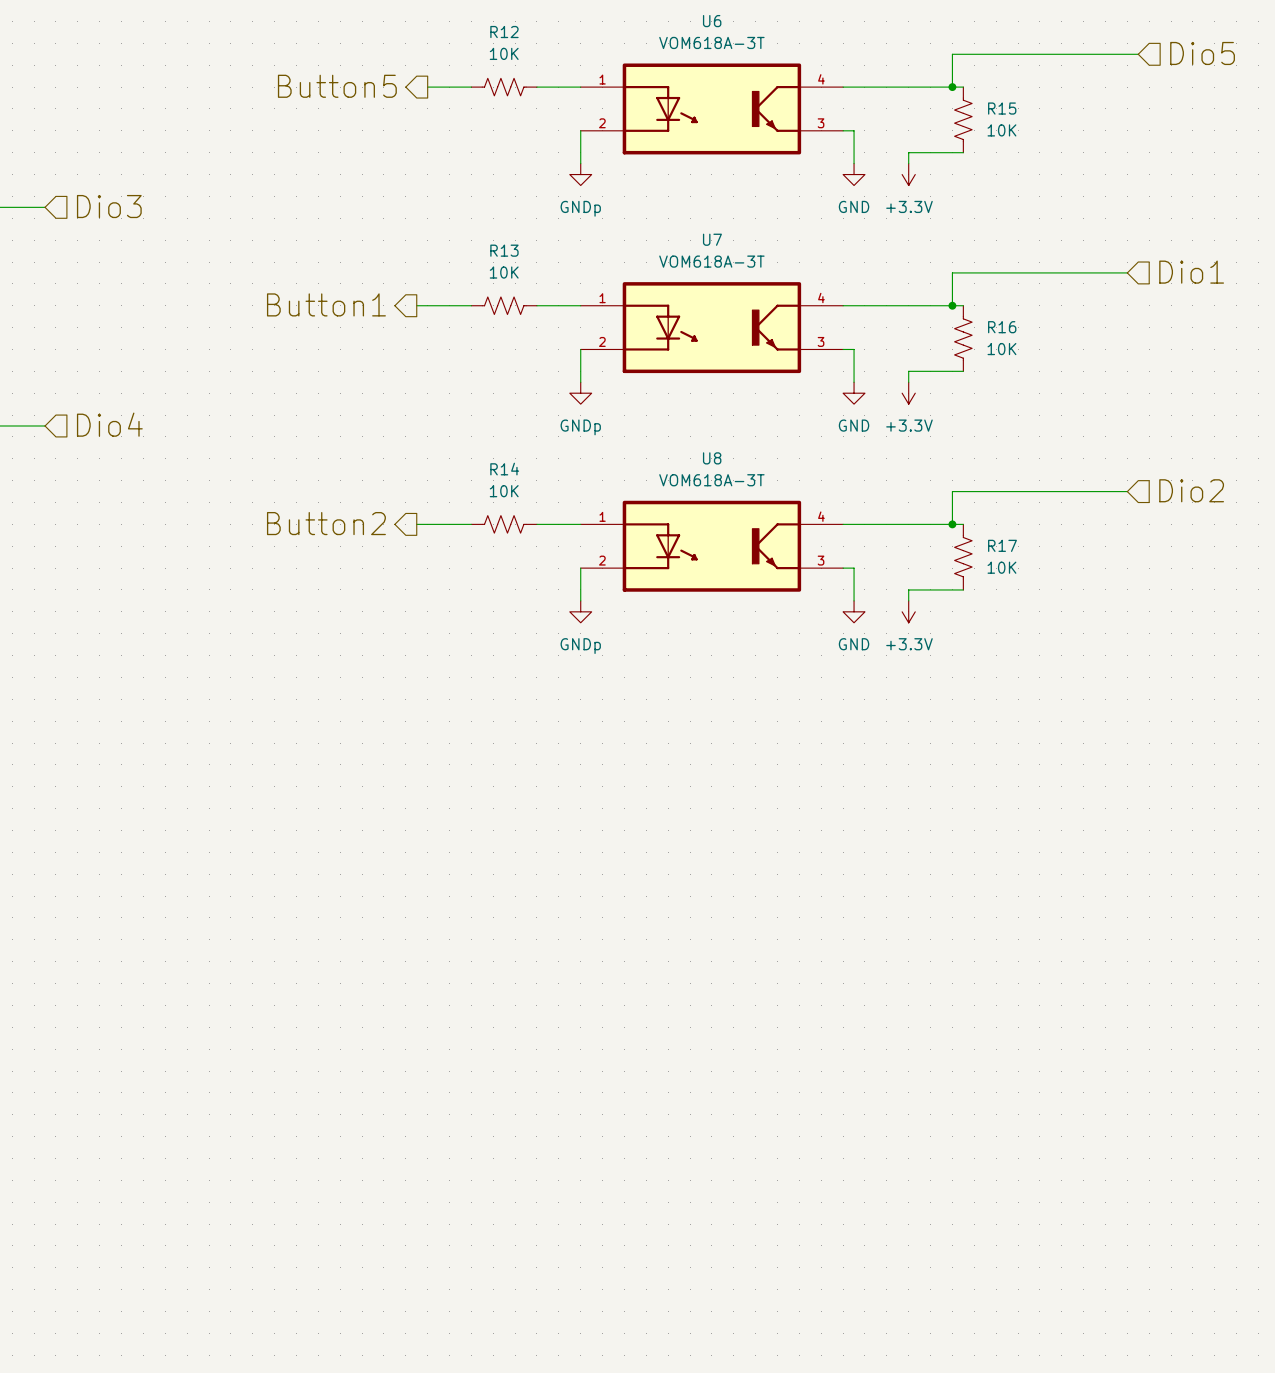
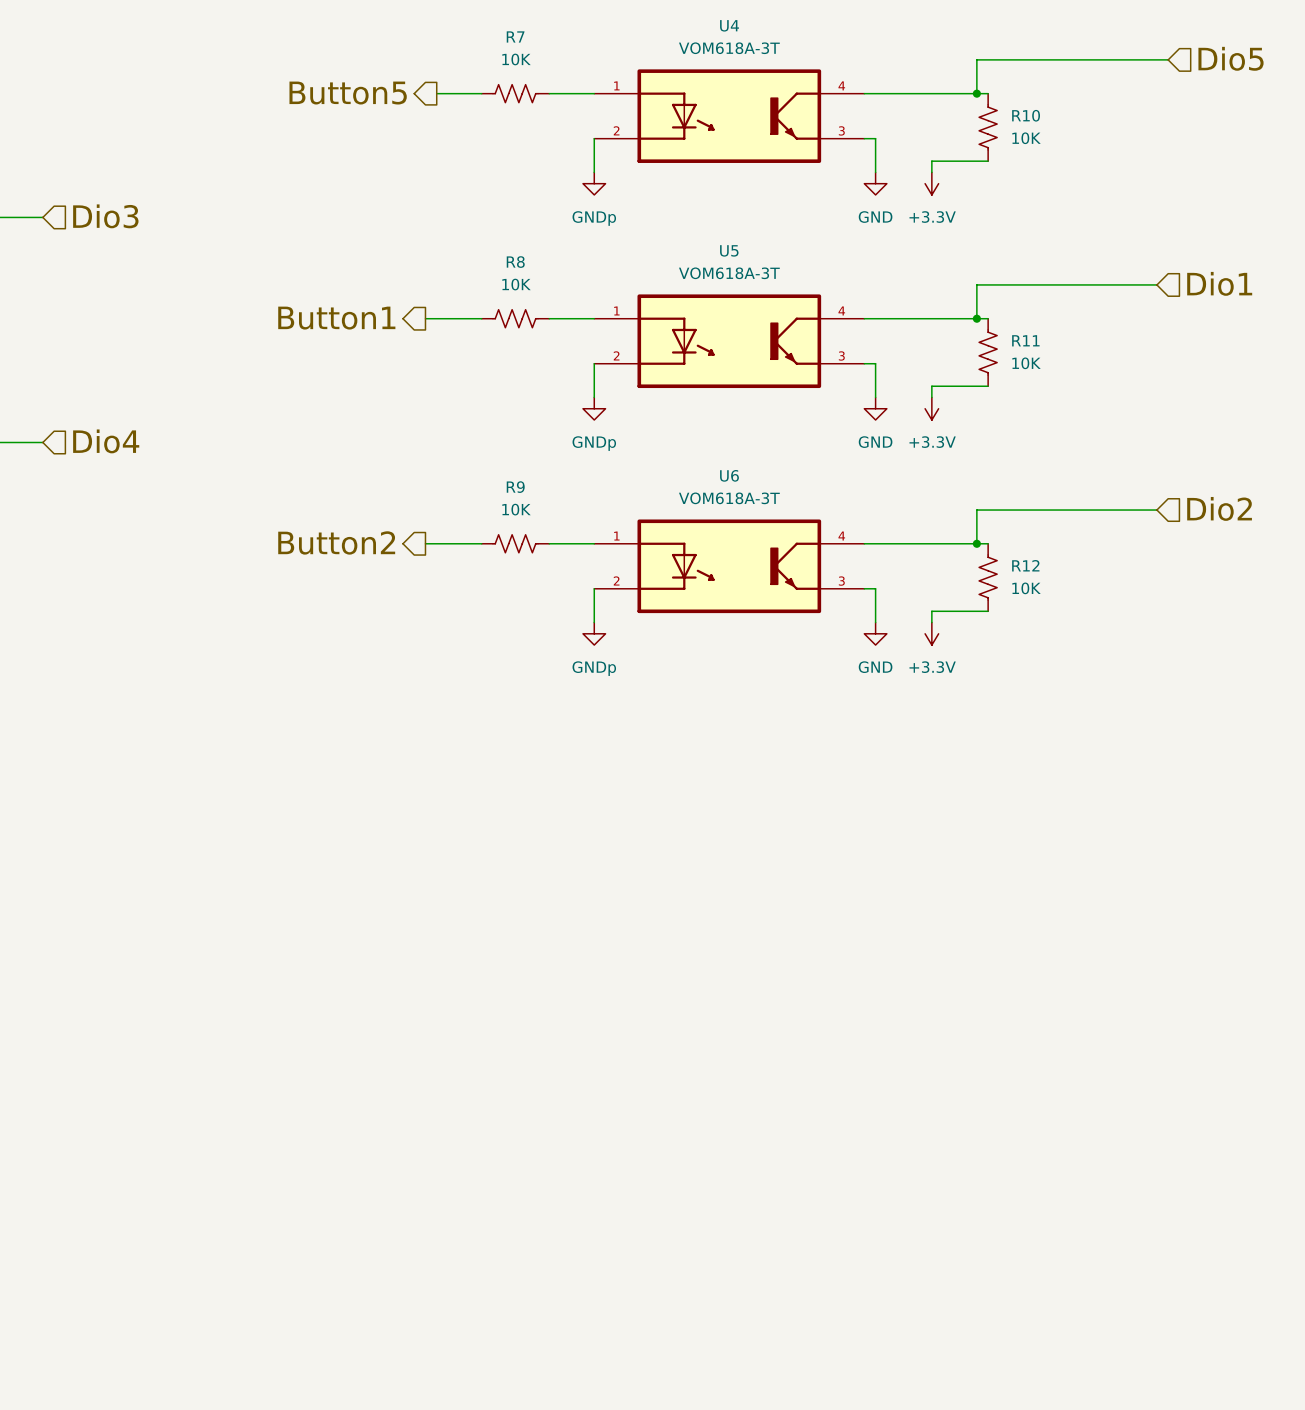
U6 name: U6 (712, 21) -> U4 (729, 25)
R12 name: R12 (504, 32) -> R7 (515, 36)
R15 name: R15 (1002, 108) -> R10 (1026, 115)
U7 name: U7 (712, 239) -> U5 (729, 250)
R13 name: R13 (504, 250) -> R8 (515, 262)
R16 name: R16 (1002, 327) -> R11 (1025, 340)
U8 name: U8 (712, 458) -> U6 (729, 475)
R14 name: R14 (504, 469) -> R9 (515, 487)
R17 name: R17 (1002, 545) -> R12 (1025, 565)

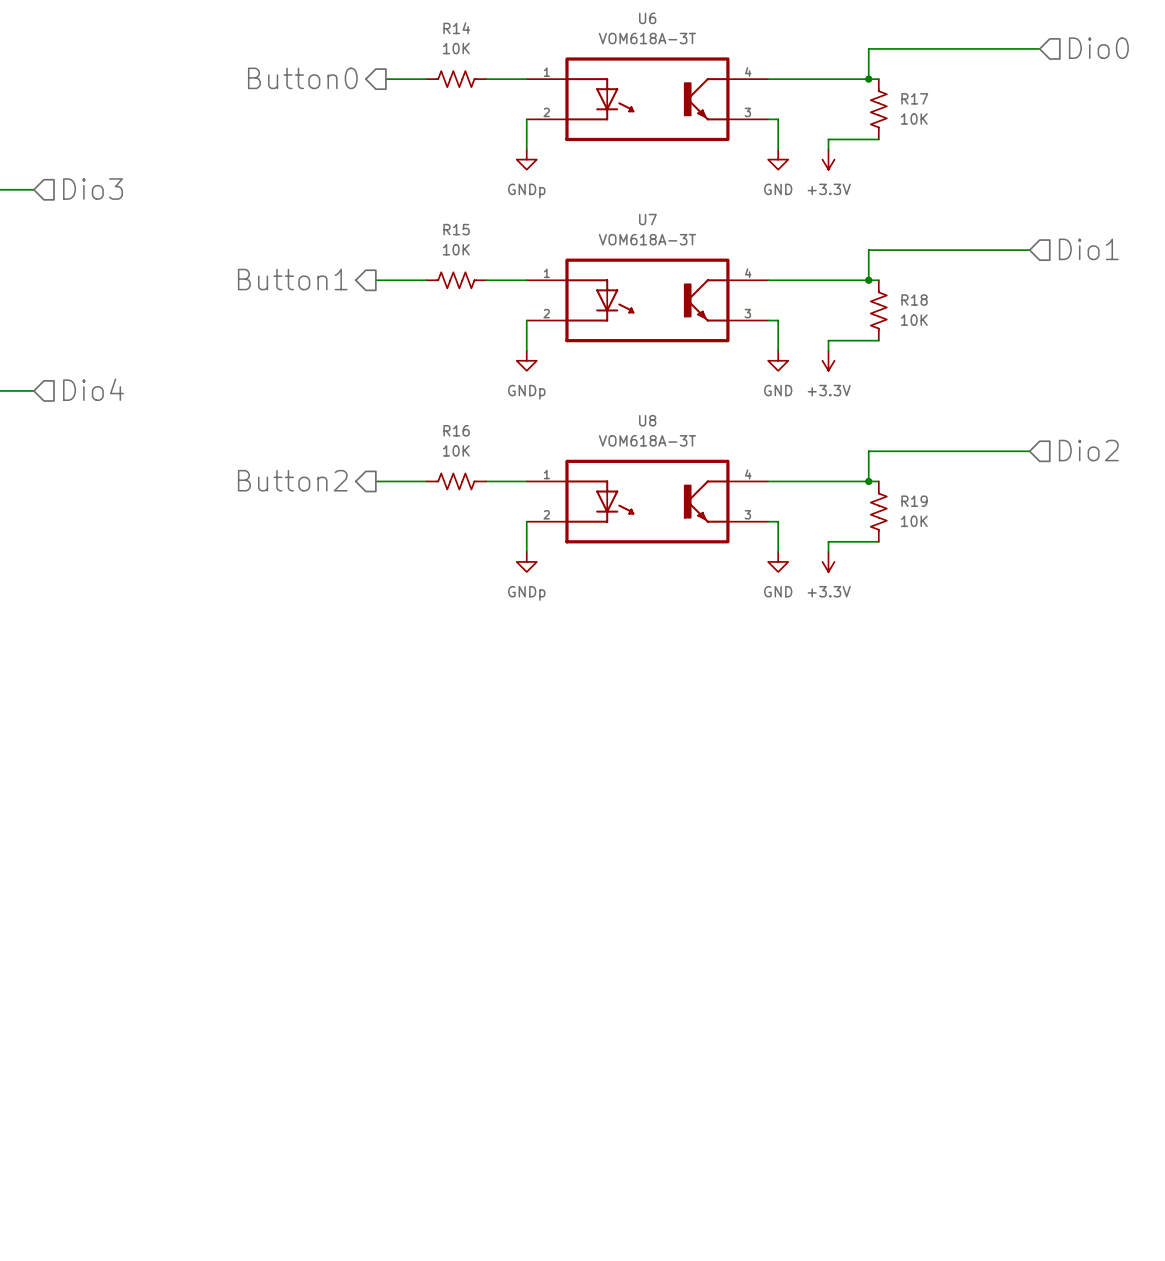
U4 name: U4 (729, 25) -> U6 (647, 18)
R7 name: R7 (515, 36) -> R14 (456, 28)
hierarchical label: Dio5 (1231, 58) -> Dio0 (1098, 48)
hierarchical label: Button5 (348, 93) -> Button0 (302, 78)
R10 name: R10 (1026, 115) -> R17 (914, 98)
U5 name: U5 (729, 250) -> U7 (647, 219)
R8 name: R8 (515, 262) -> R15 (456, 229)
R11 name: R11 (1025, 340) -> R18 (914, 300)
U6 name: U6 (729, 475) -> U8 (647, 420)
R9 name: R9 (515, 487) -> R16 (456, 430)
R12 name: R12 (1025, 565) -> R19 (914, 501)

